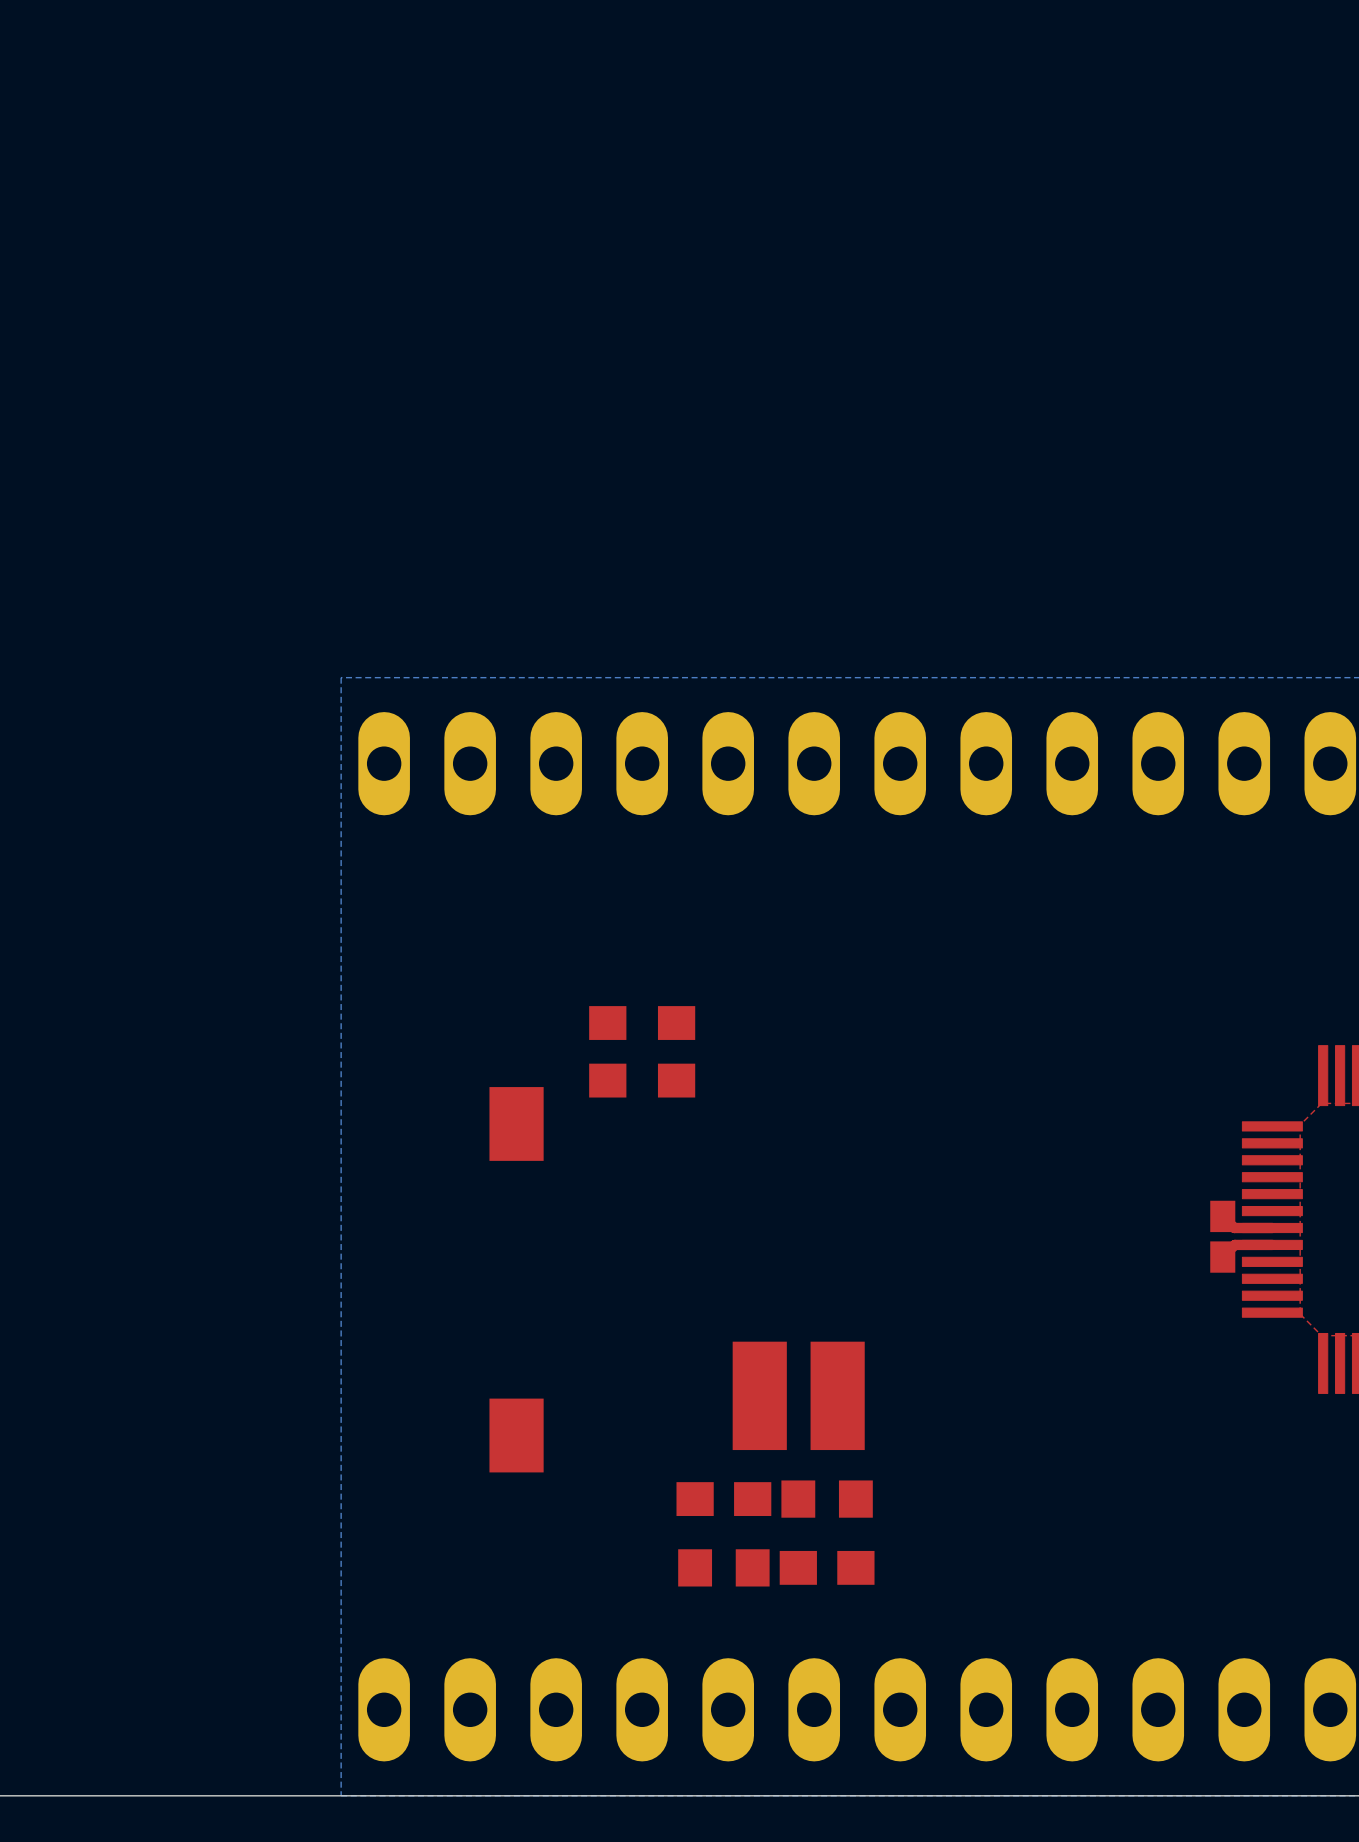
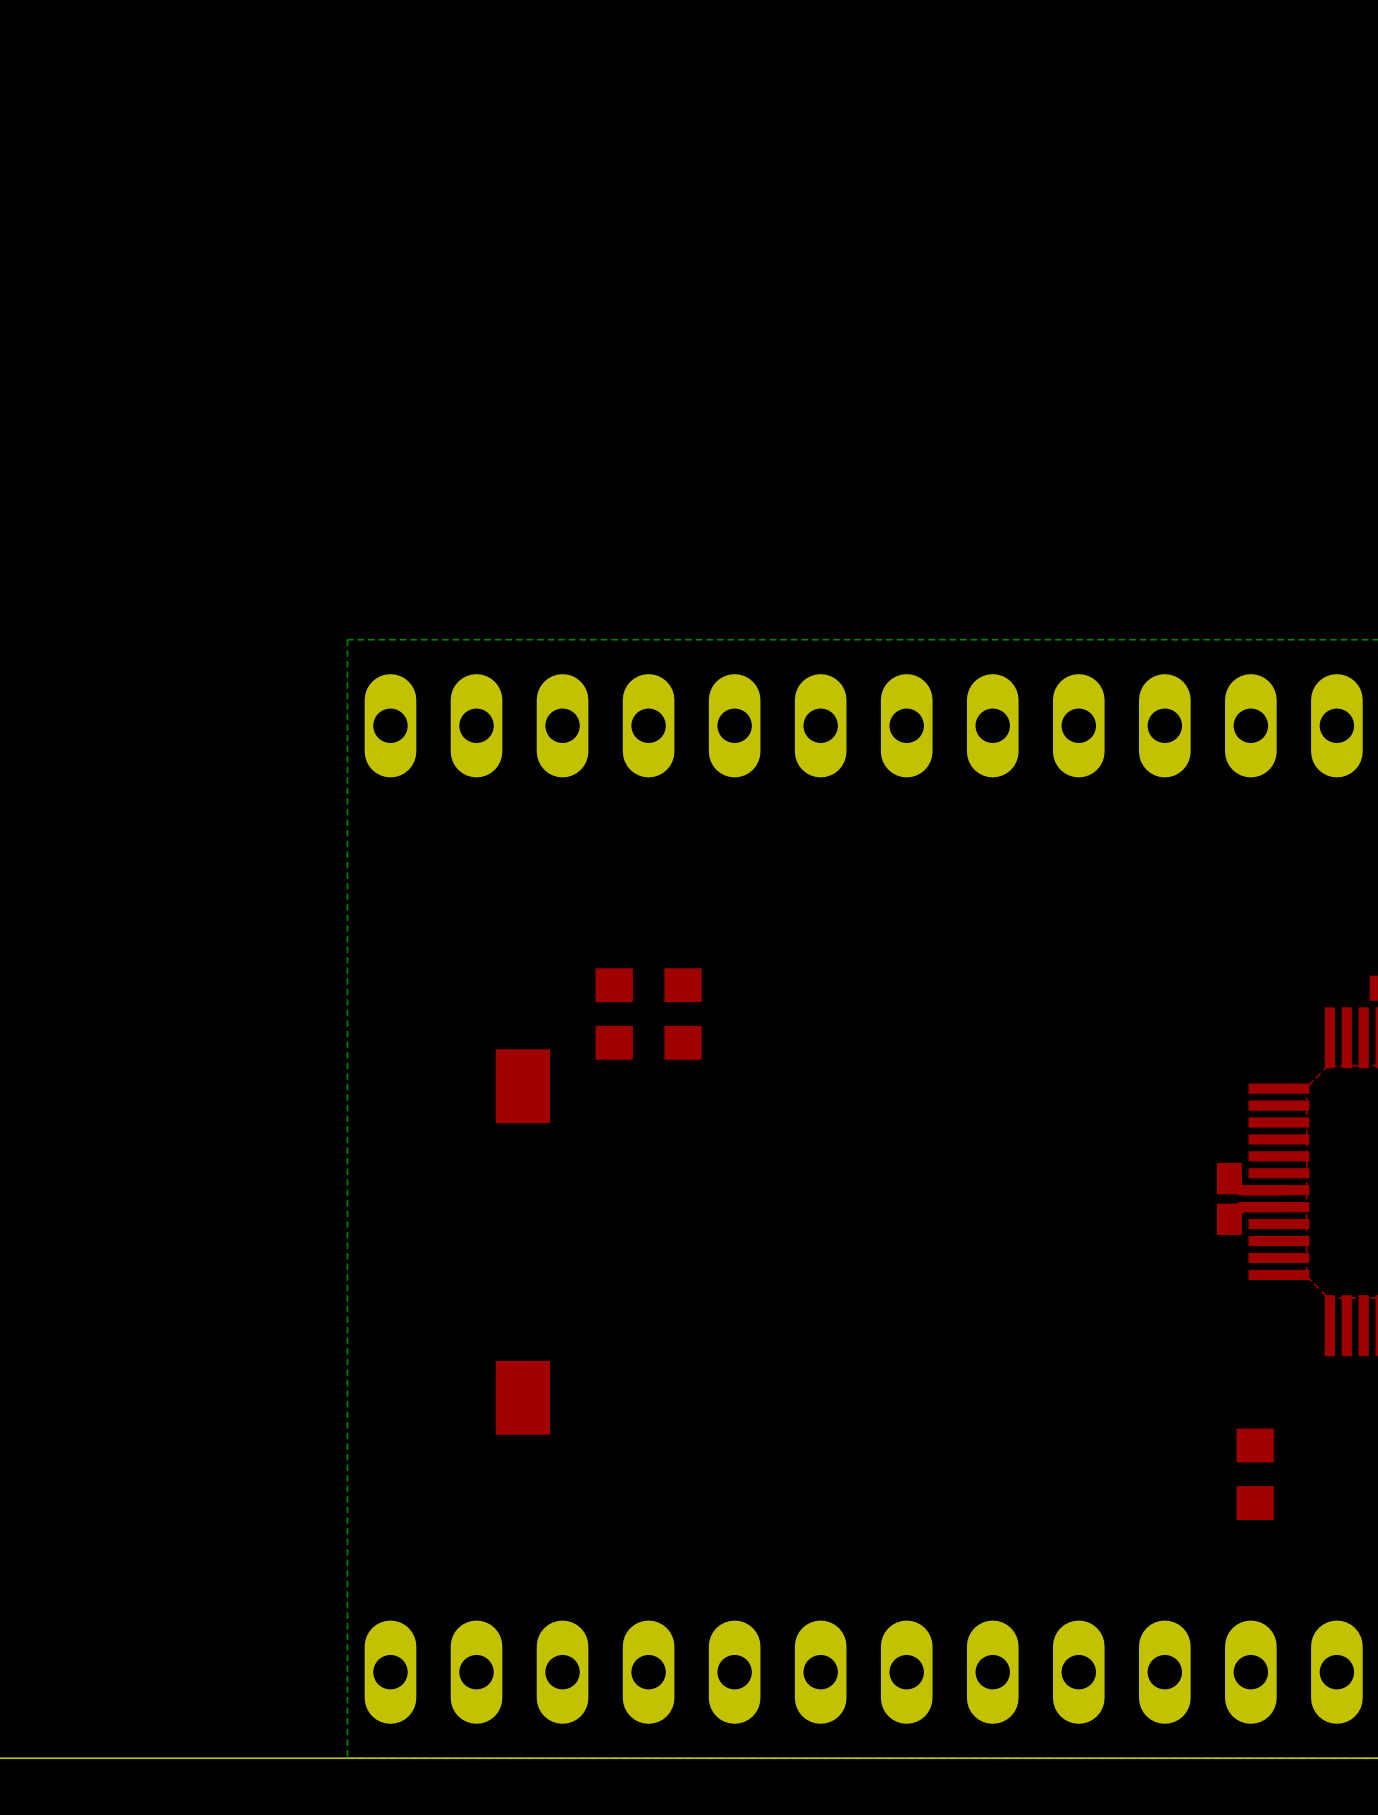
part: (798, 1395) -> none
part: (723, 1499) -> none
part: (827, 1499) -> none
part: none -> (1255, 1474)
part: (723, 1567) -> none
part: (827, 1567) -> none

